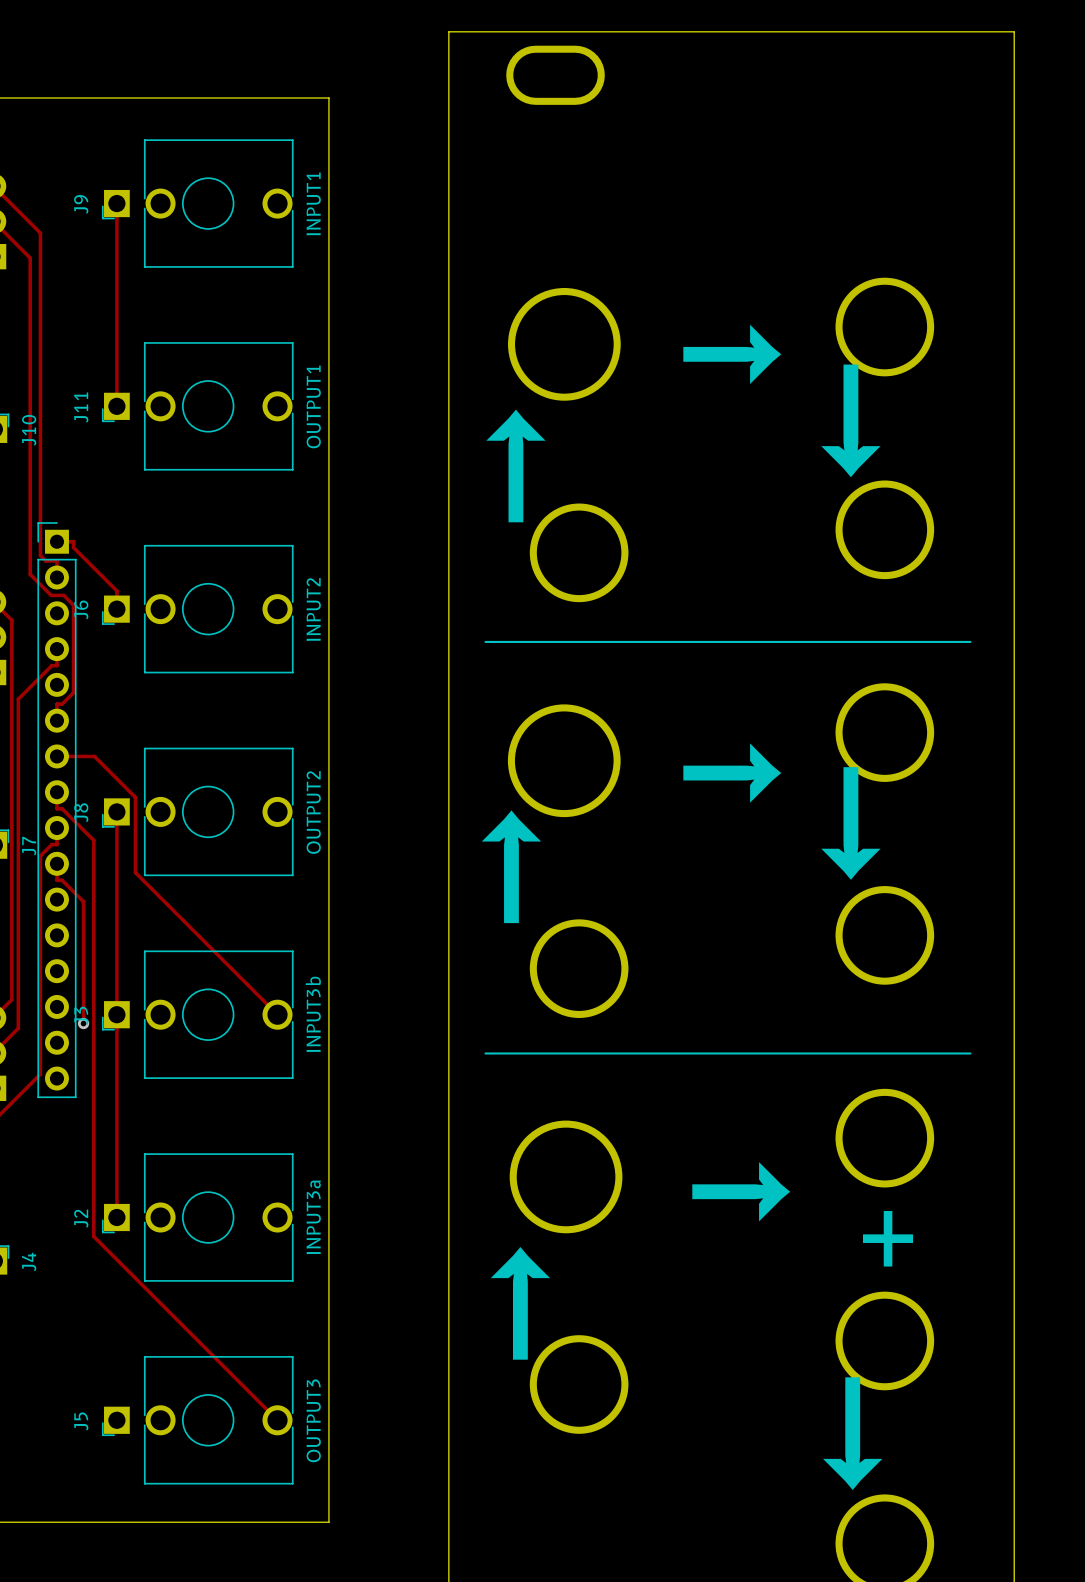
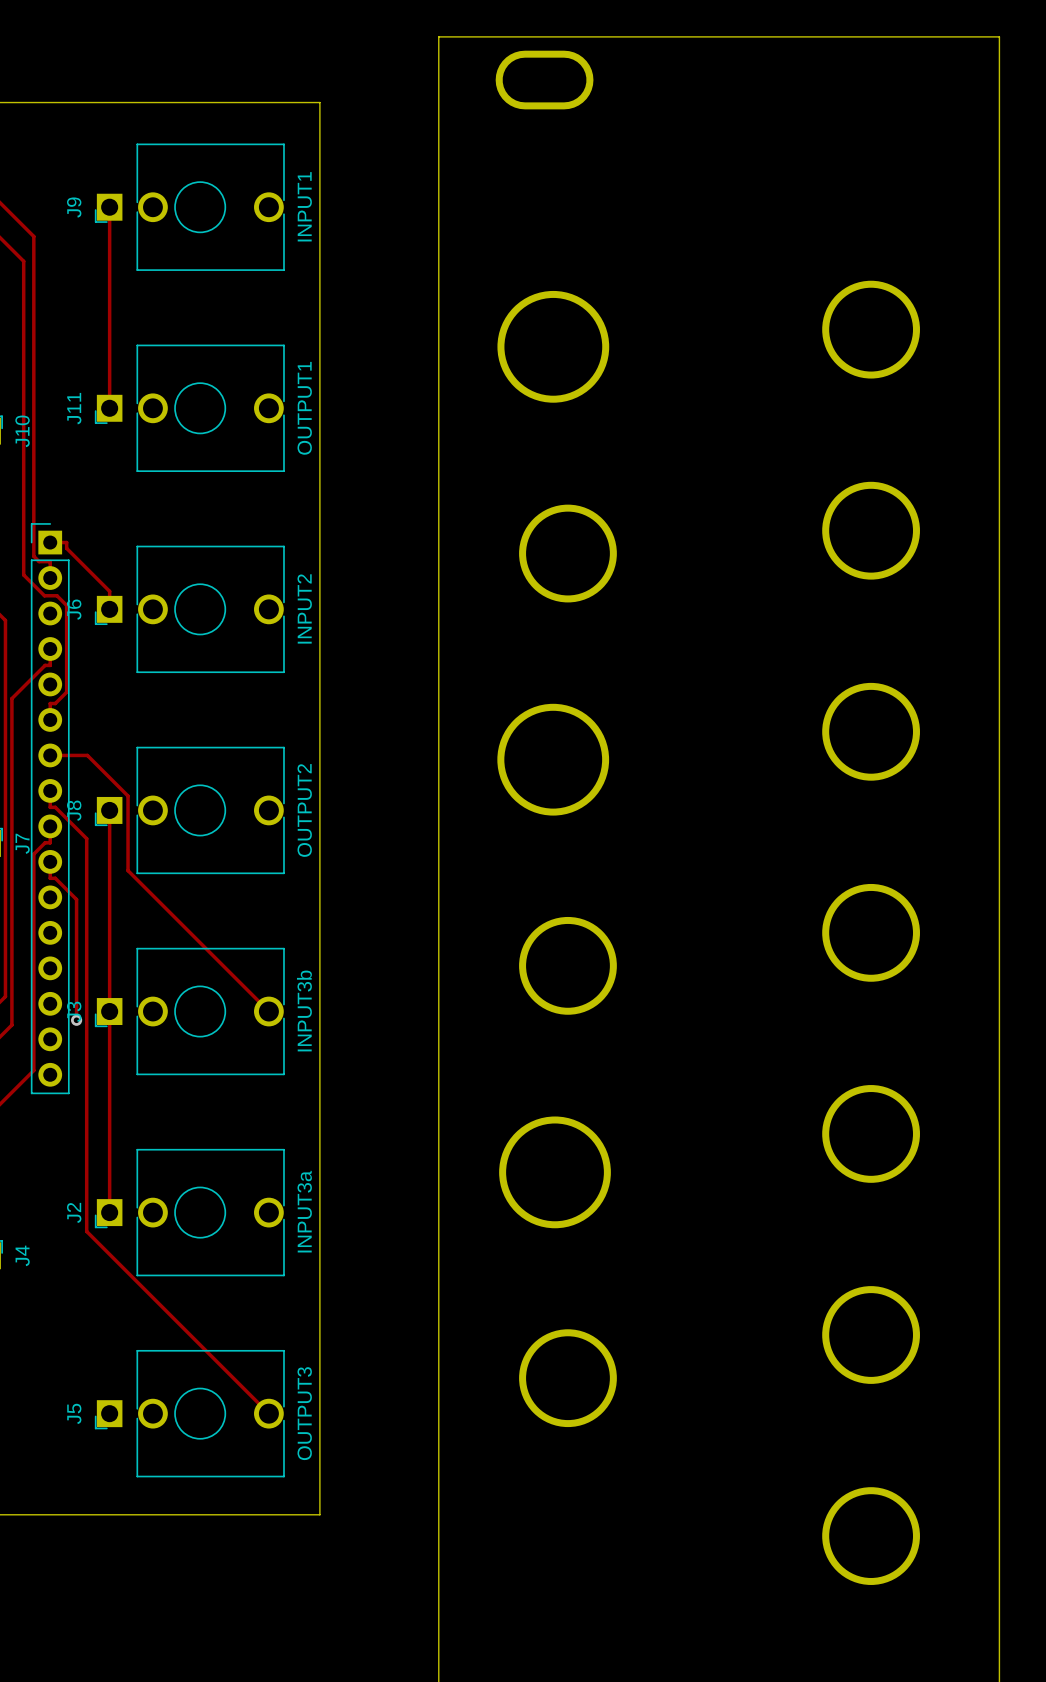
text: → (732, 354) -> none
text: ↓ (850, 420) -> none
text: ↑ (515, 465) -> none
line: (485, 641) (970, 641) -> none
text: → (732, 773) -> none
text: ↓ (850, 823) -> none
text: ↑ (511, 866) -> none
line: (485, 1053) (970, 1053) -> none
text: → (741, 1191) -> none
text: + (888, 1238) -> none
text: ↑ (520, 1303) -> none
text: ↓ (852, 1433) -> none

